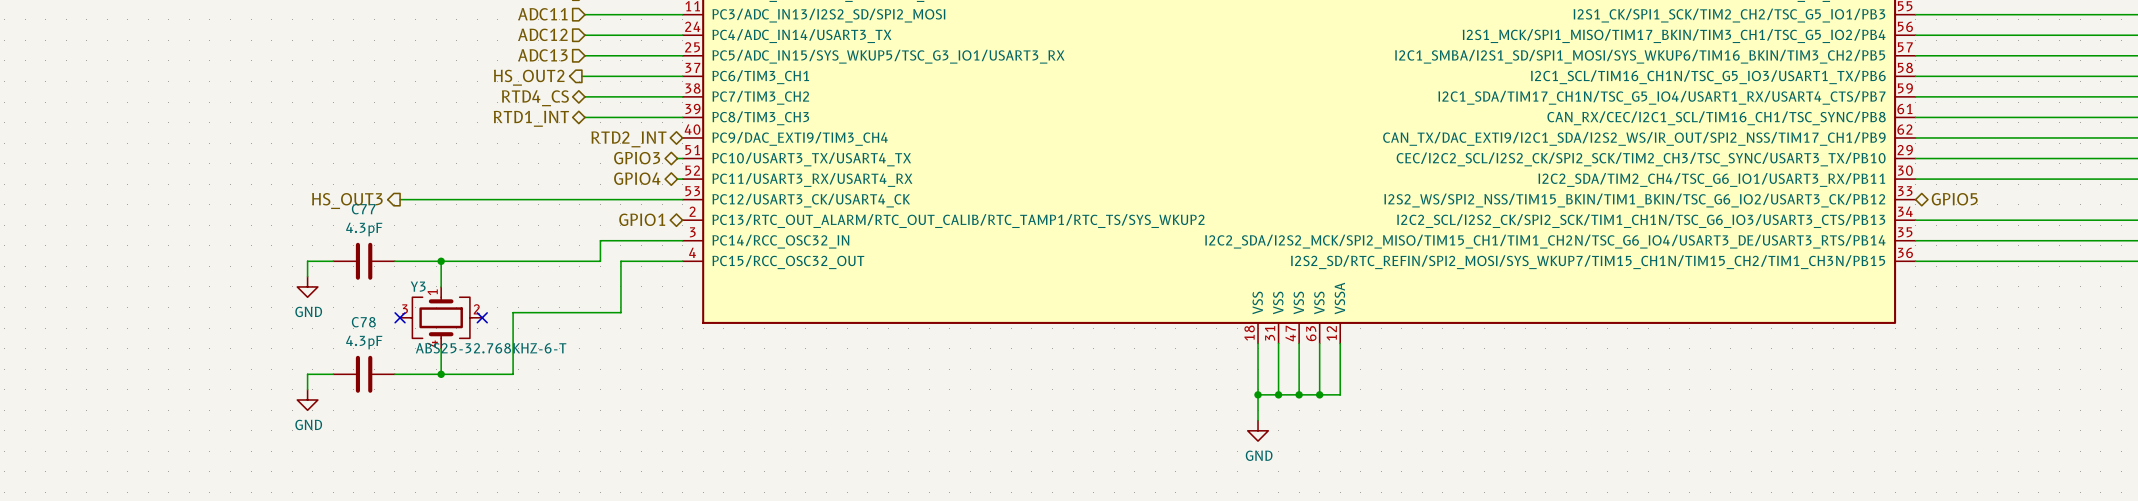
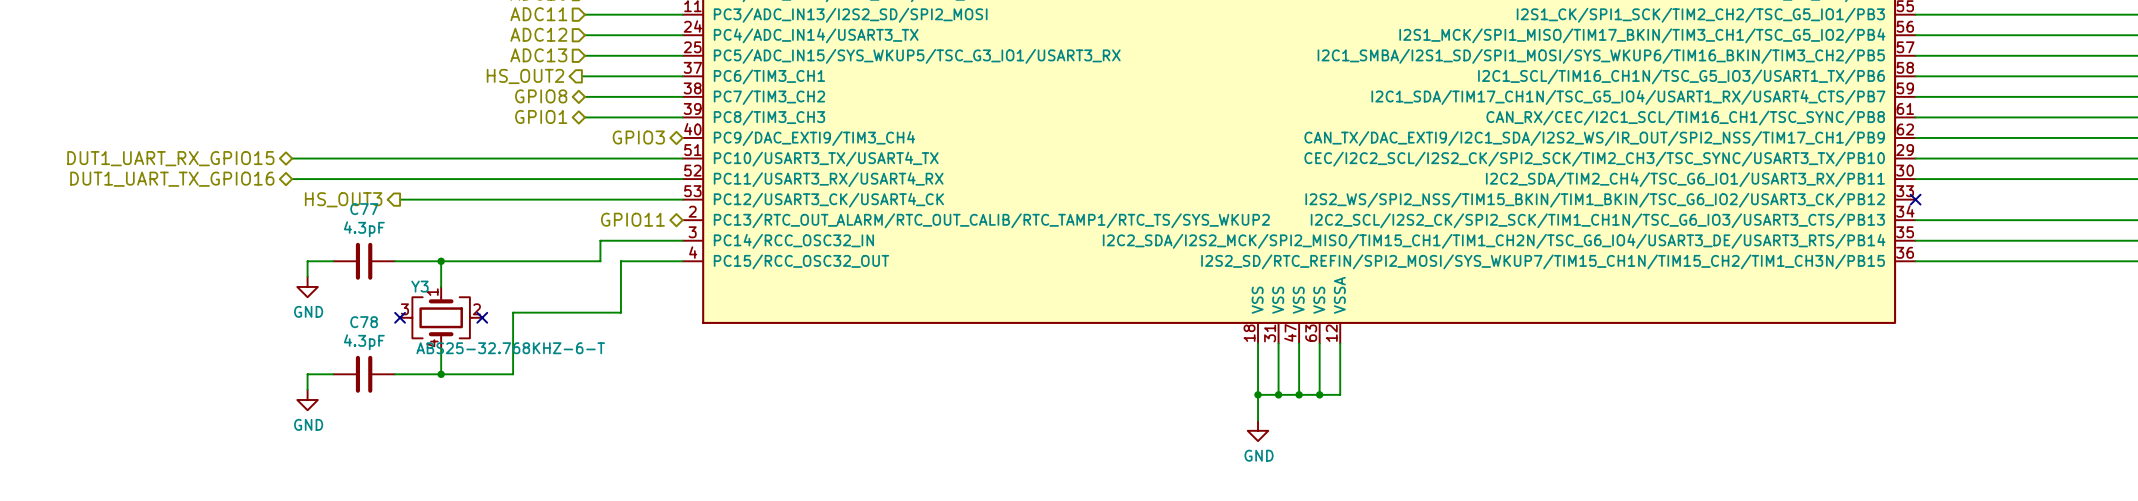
hierarchical label: RTD4_CS (535, 98) -> GPIO8 (541, 96)
hierarchical label: RTD1_INT (531, 118) -> GPIO1 (541, 116)
hierarchical label: RTD2_INT (628, 139) -> GPIO3 (638, 137)
wire: none -> (292, 158) (677, 158)
hierarchical label: GPIO3 (637, 158) -> none
hierarchical label: none -> DUT1_UART_RX_GPIO15 (170, 158)
hierarchical label: GPIO4 (637, 178) -> none
wire: none -> (292, 179) (677, 179)
hierarchical label: none -> DUT1_UART_TX_GPIO16 (172, 179)
no-connect mark: none -> (1915, 199)
hierarchical label: GPIO5 (1954, 199) -> none
hierarchical label: GPIO1 (642, 219) -> GPIO11 (632, 219)

